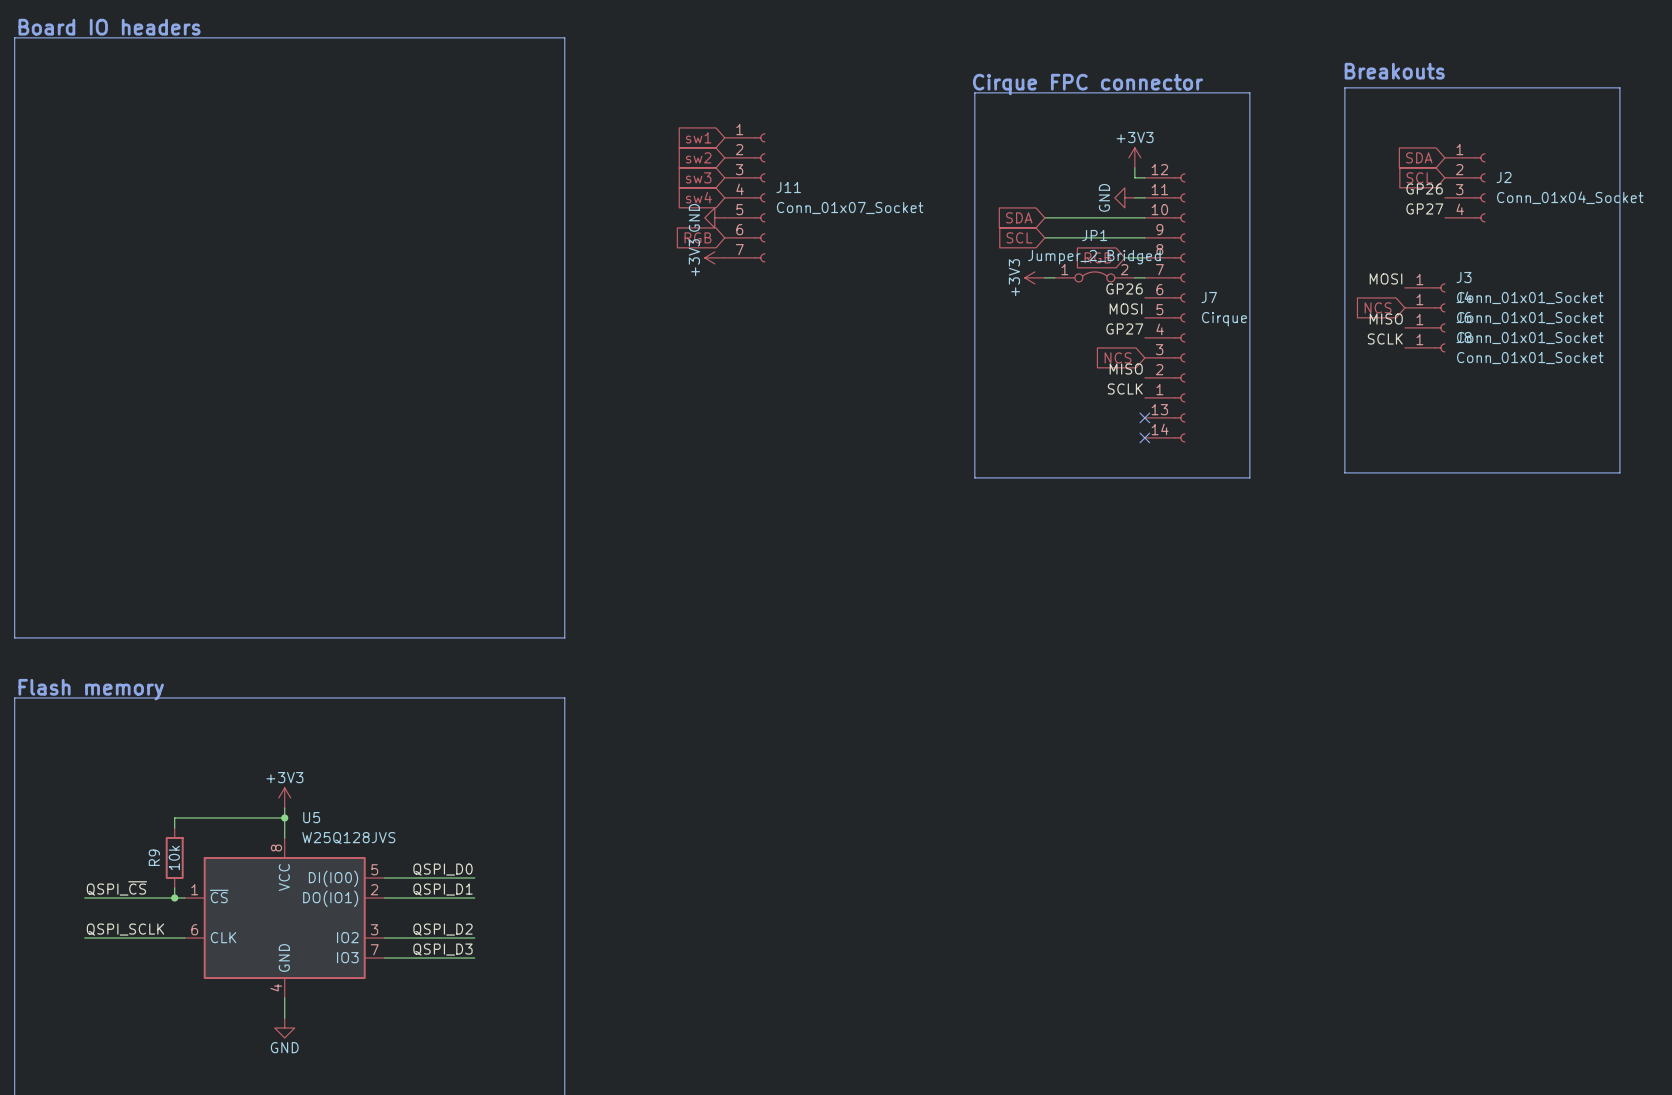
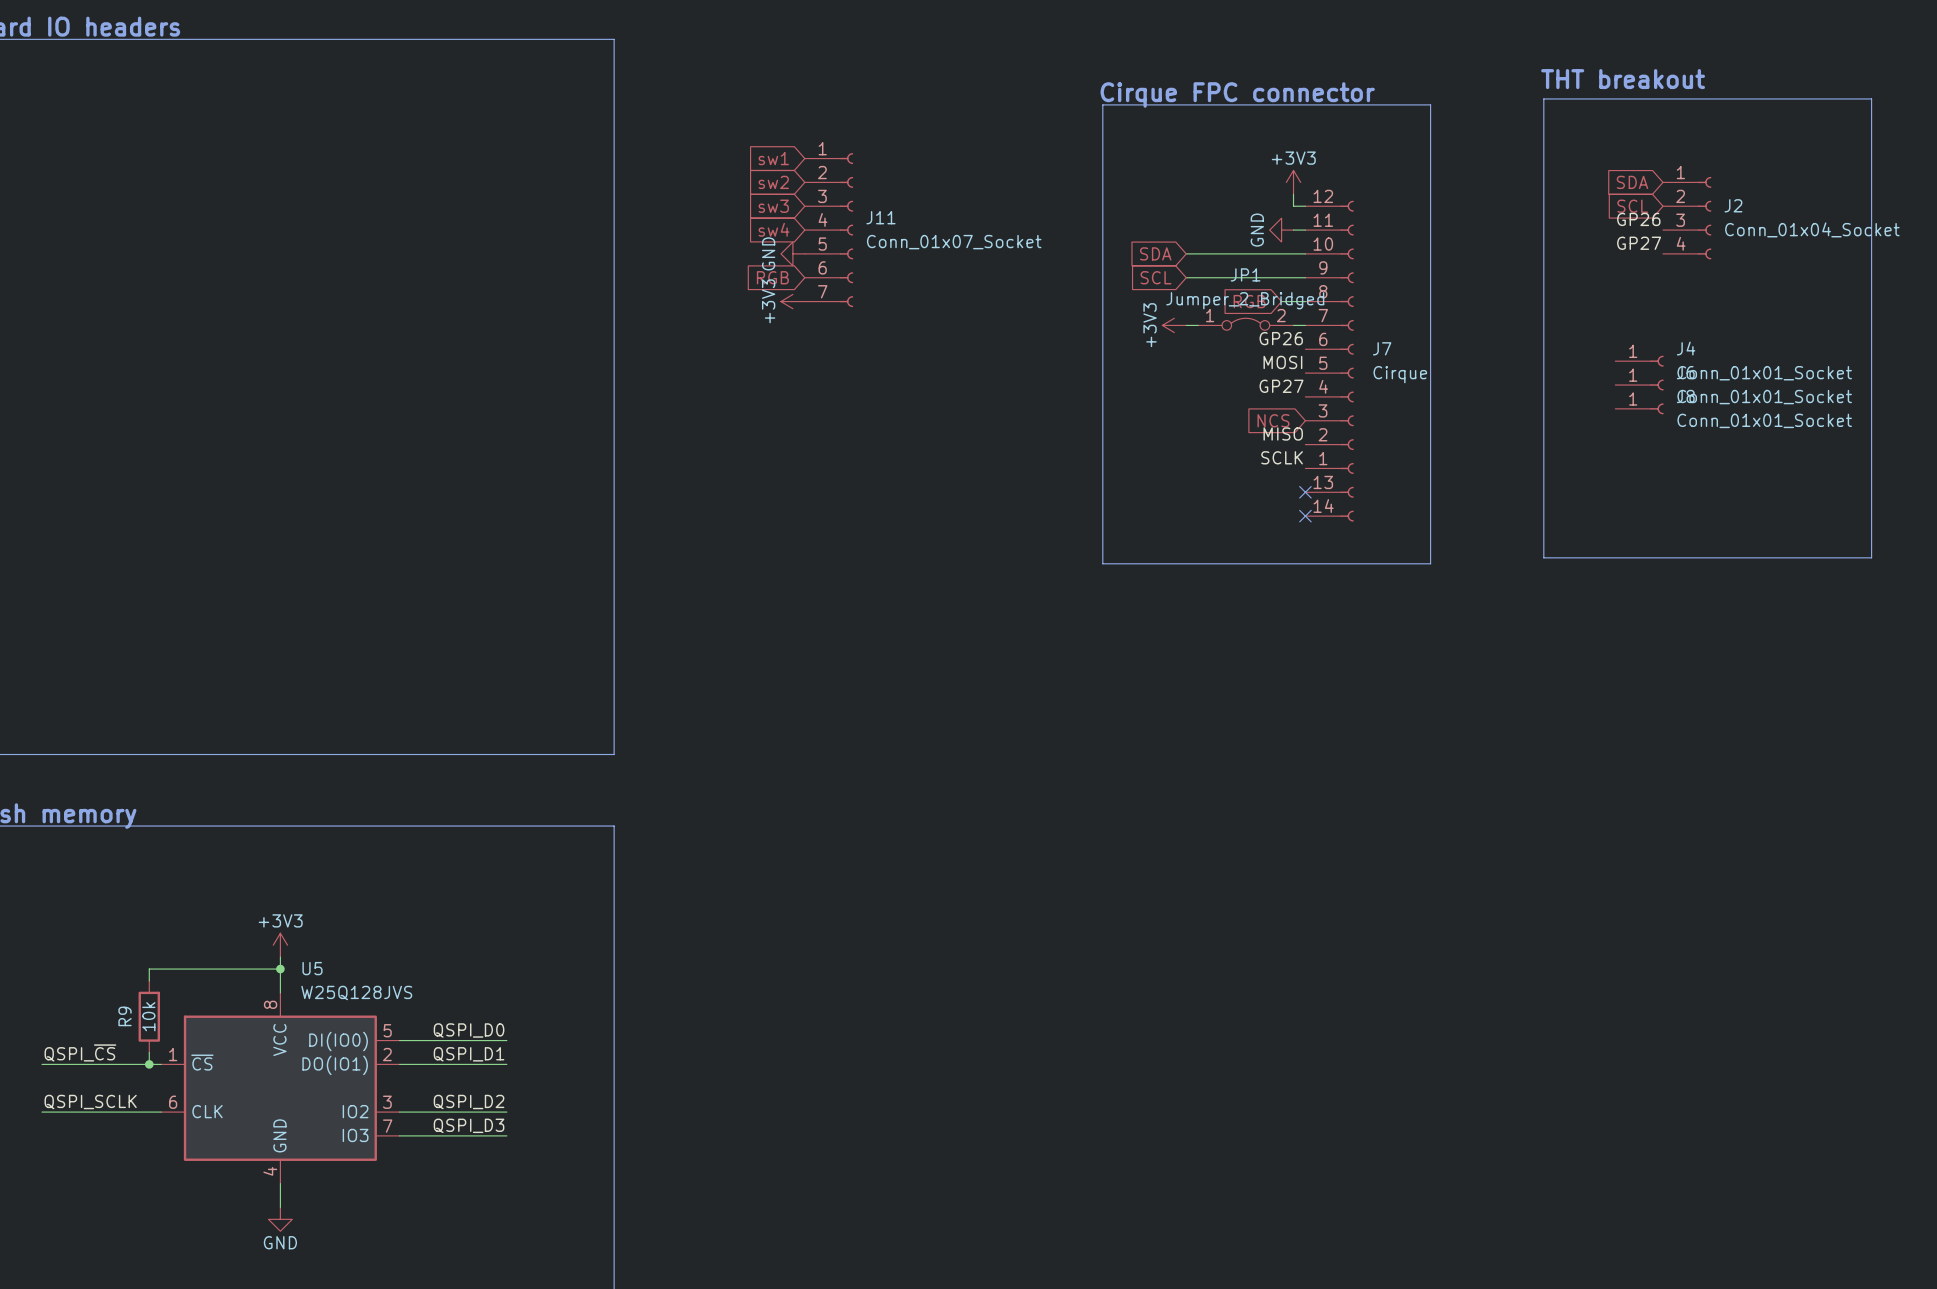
text: Breakouts (1394, 71) -> THT breakout (1623, 79)
label: MOSI (1386, 278) -> none
J3: Conn_01x01_Socket (1425, 287) -> none
global label: NCS (1378, 307) -> none
label: MISO (1386, 318) -> none
label: SCLK (1385, 338) -> none

